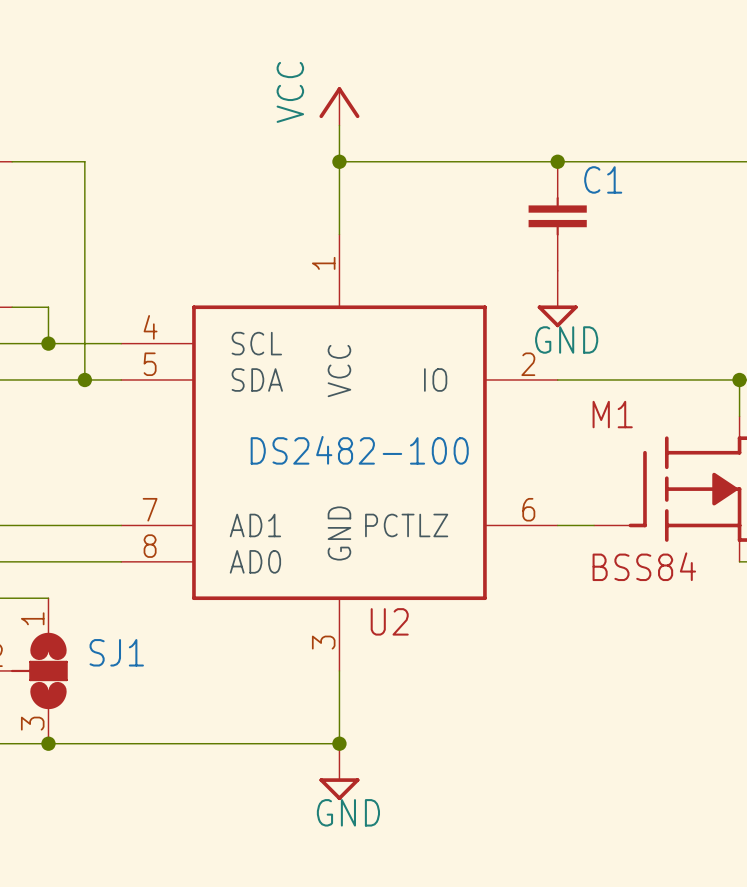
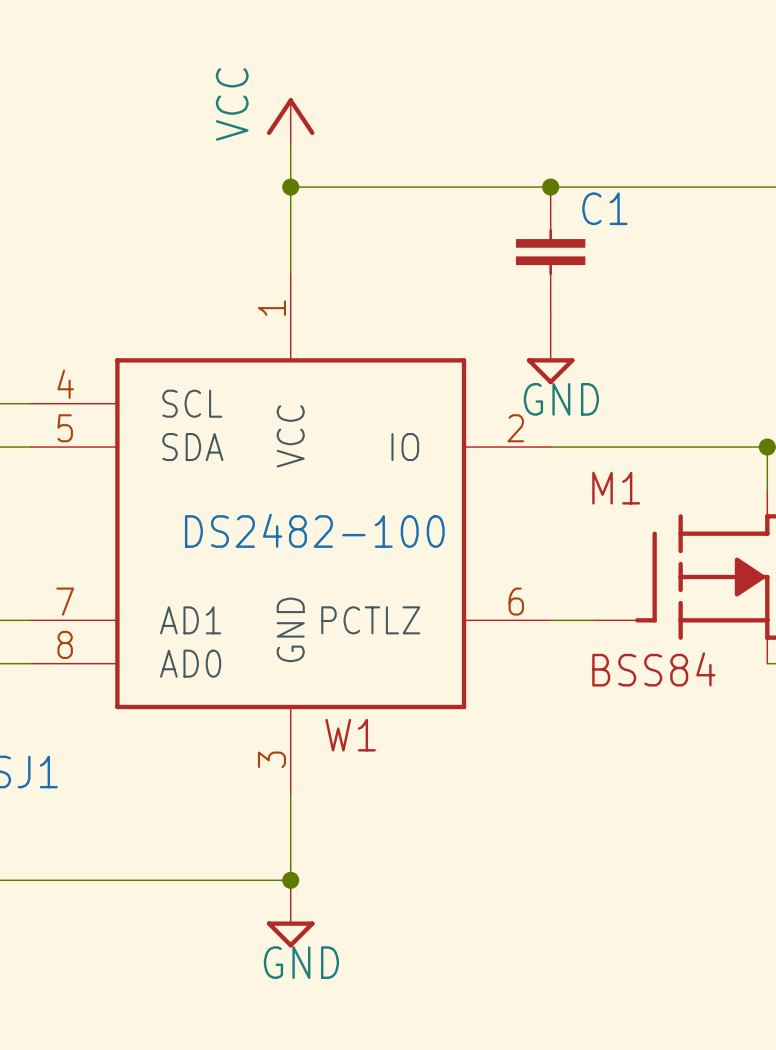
U2 name: U2 (389, 621) -> W1 (350, 735)

